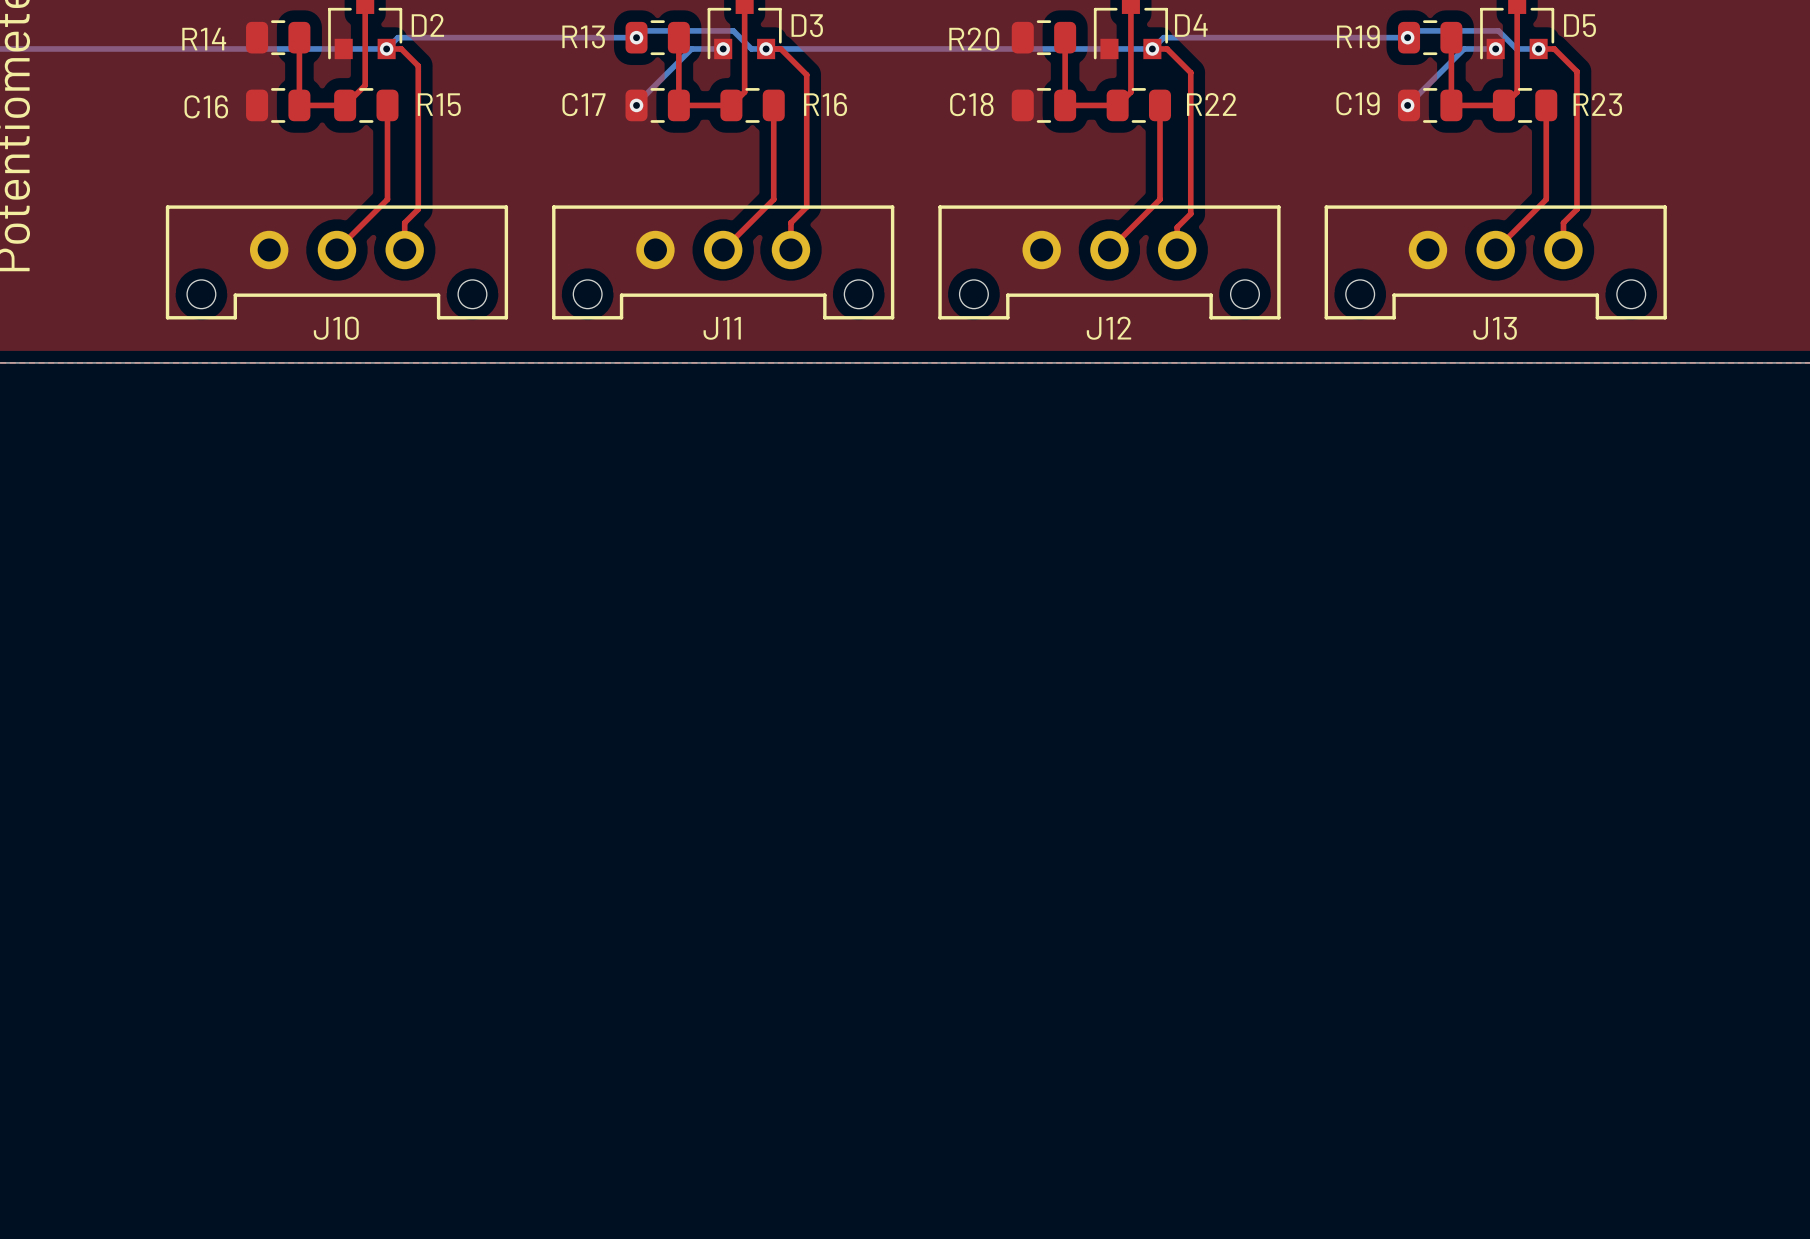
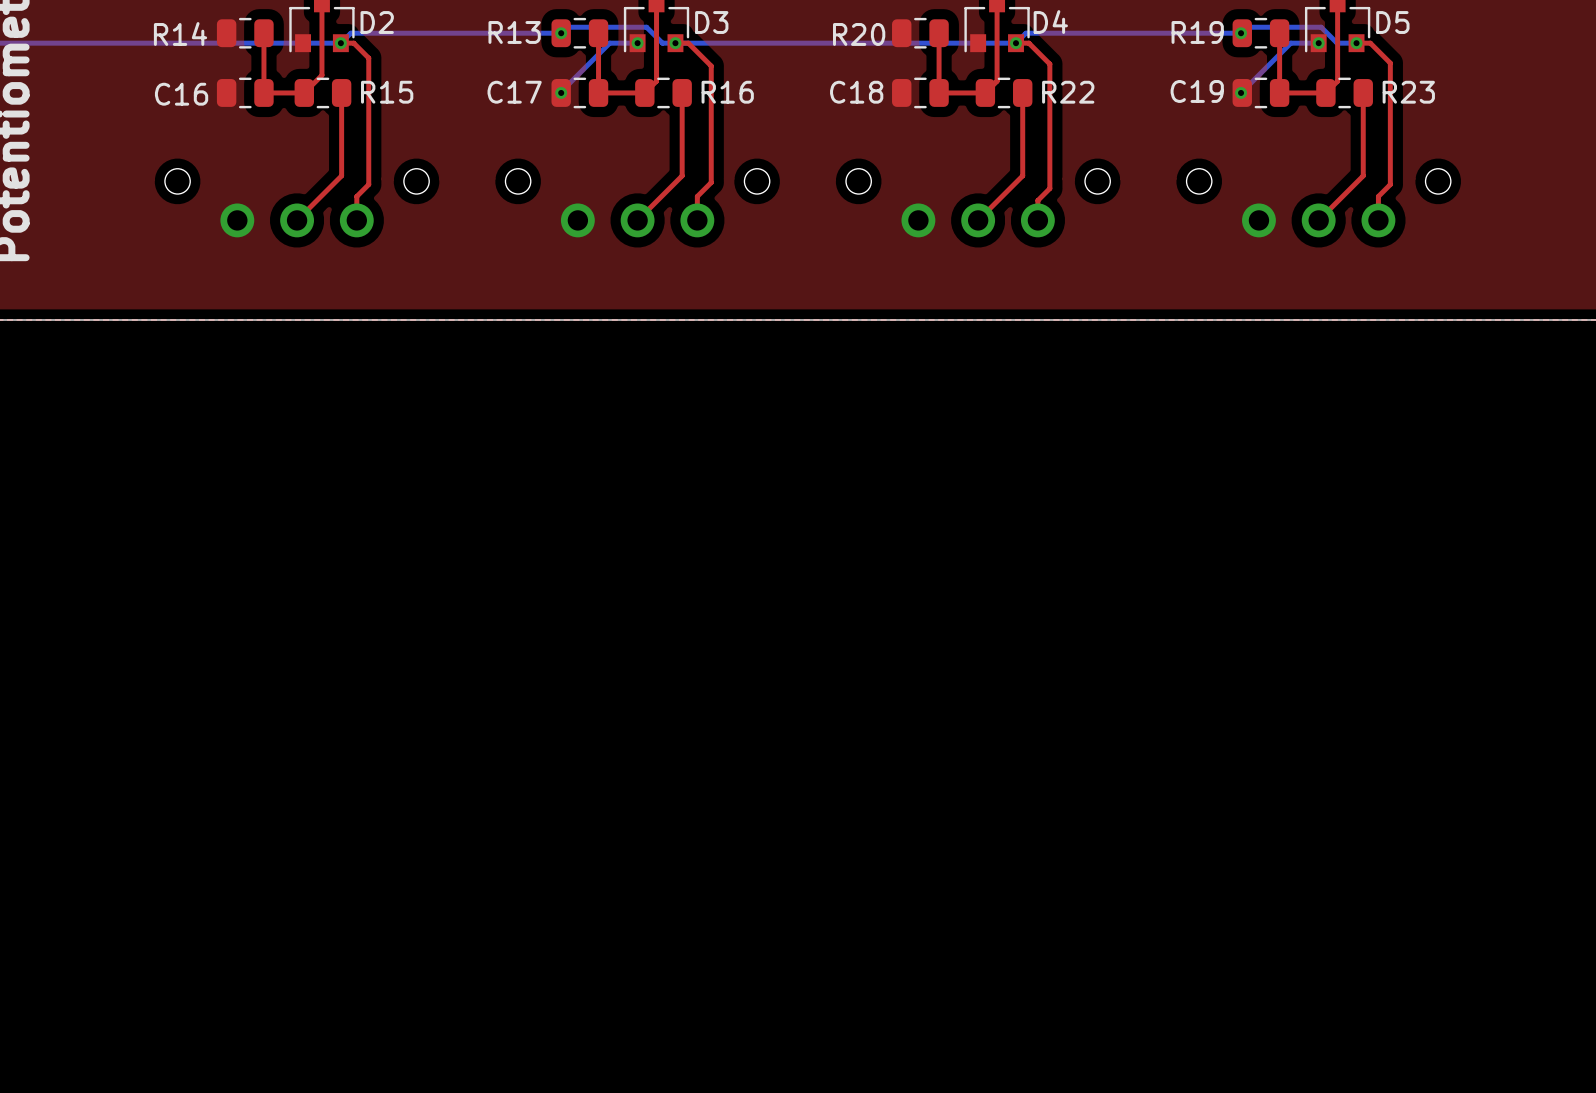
J10 side: top (336, 262) -> bottom (297, 203)
J11 side: top (723, 262) -> bottom (637, 203)
J12 side: top (1109, 262) -> bottom (978, 203)
J13 side: top (1495, 262) -> bottom (1318, 203)

